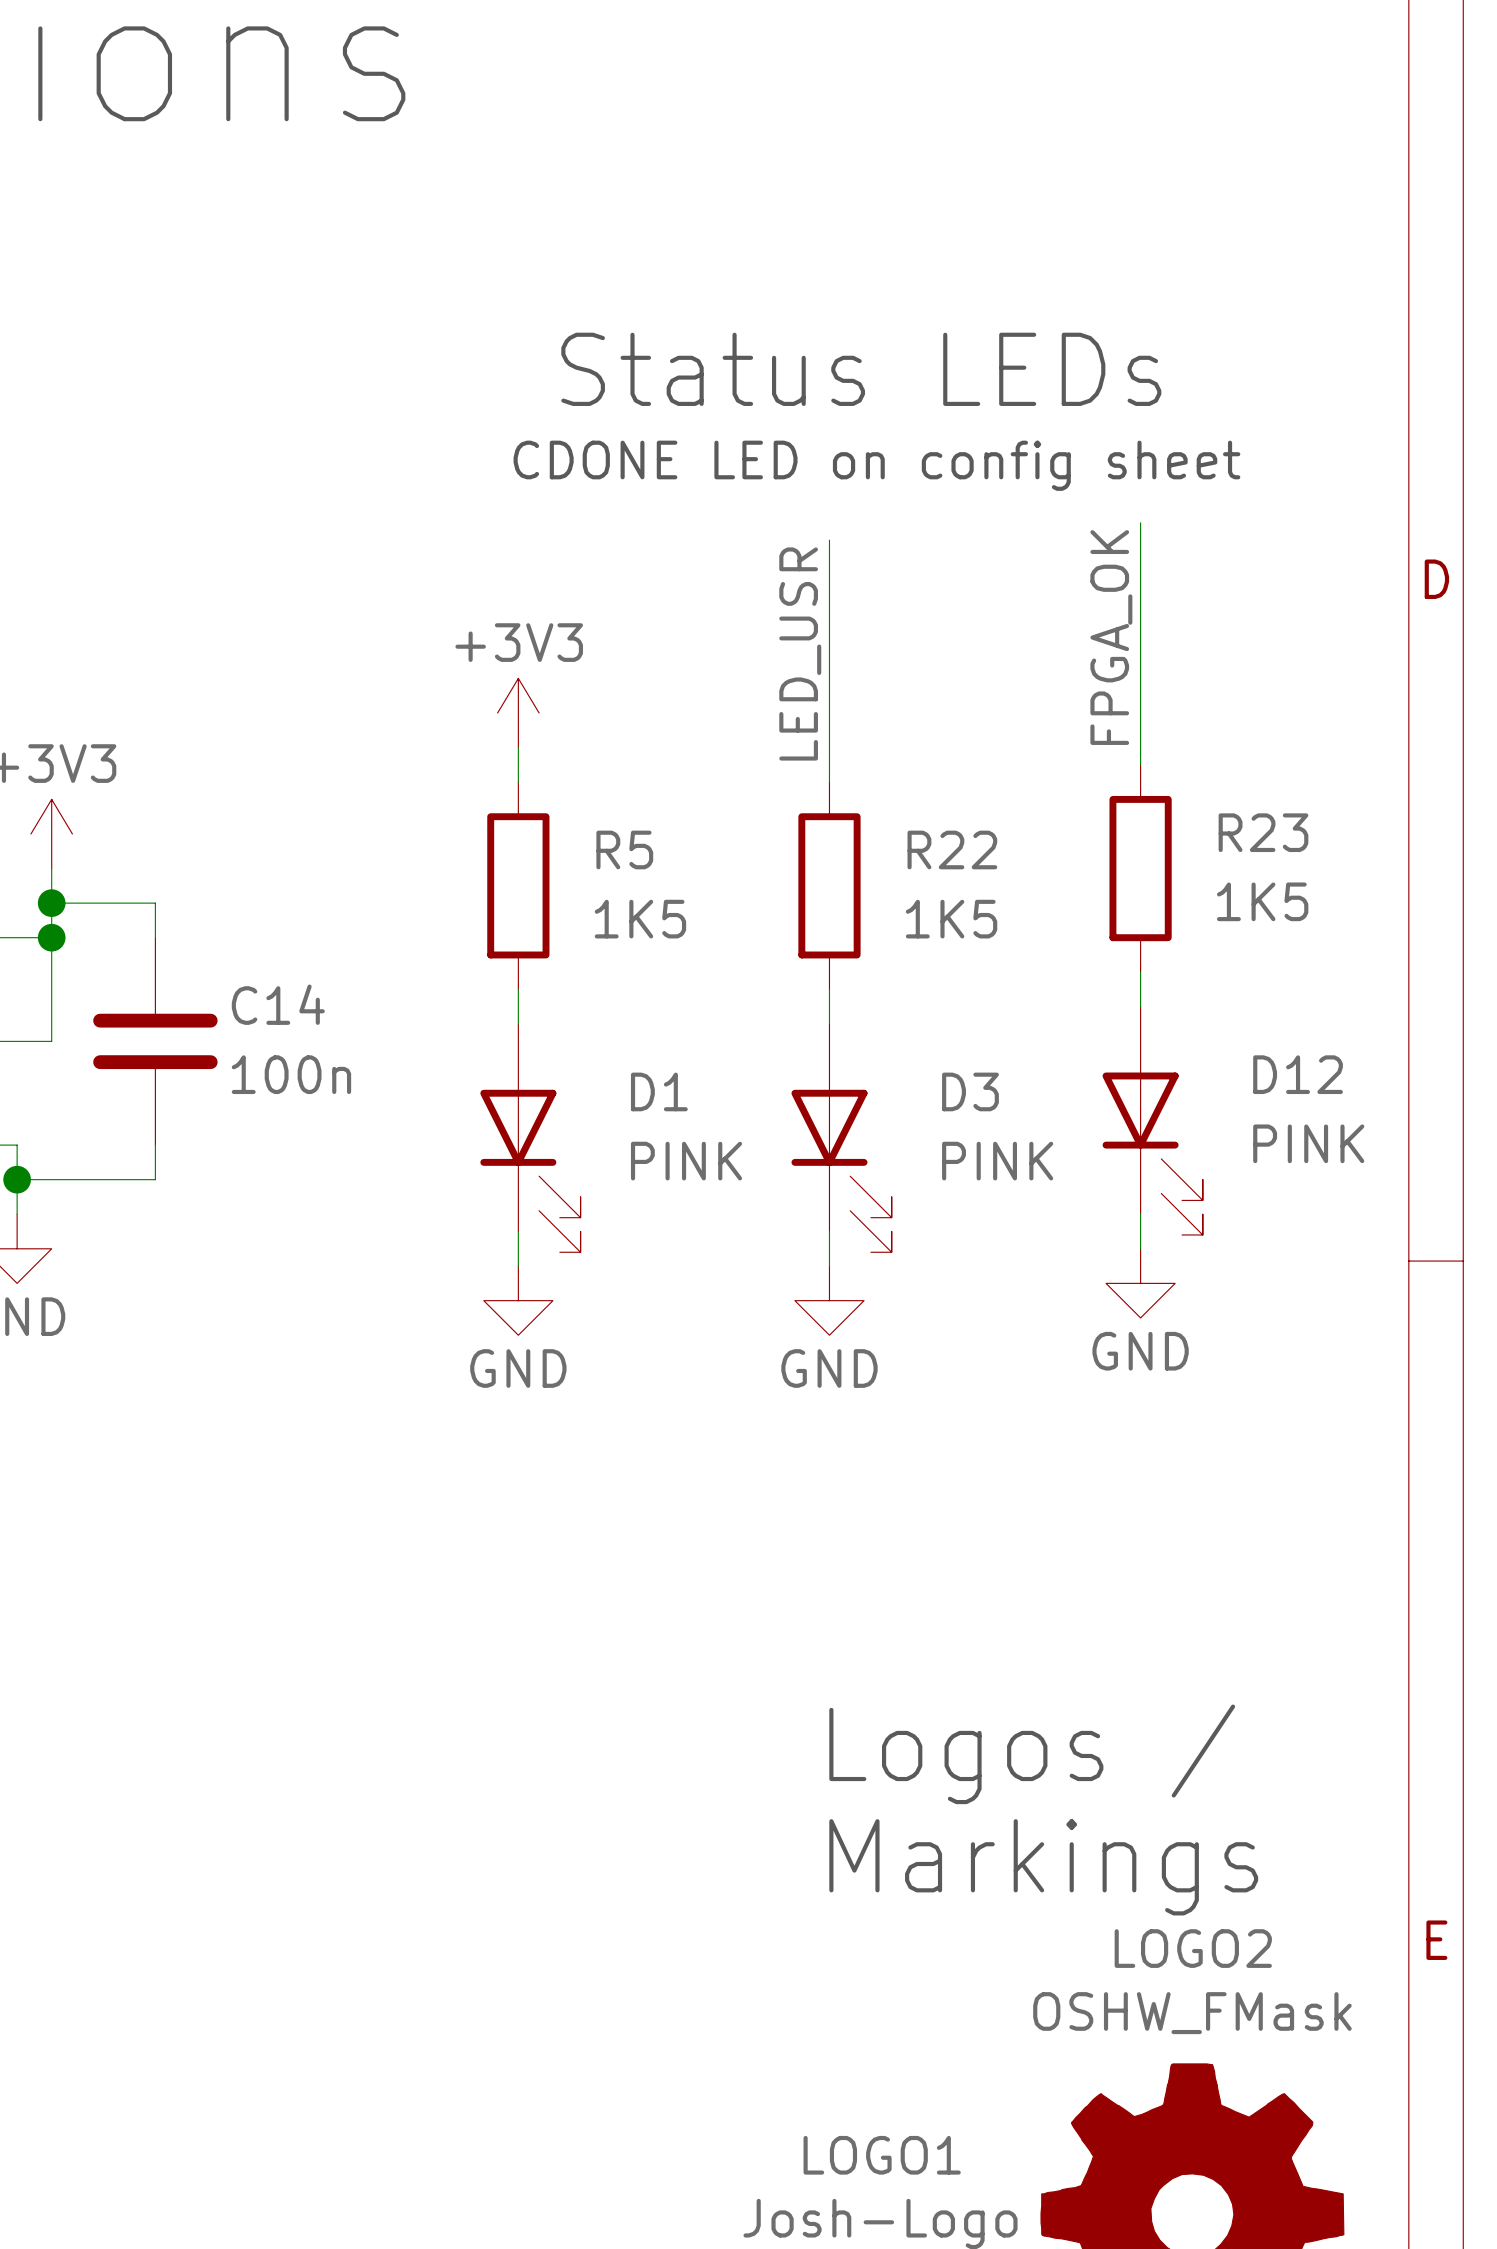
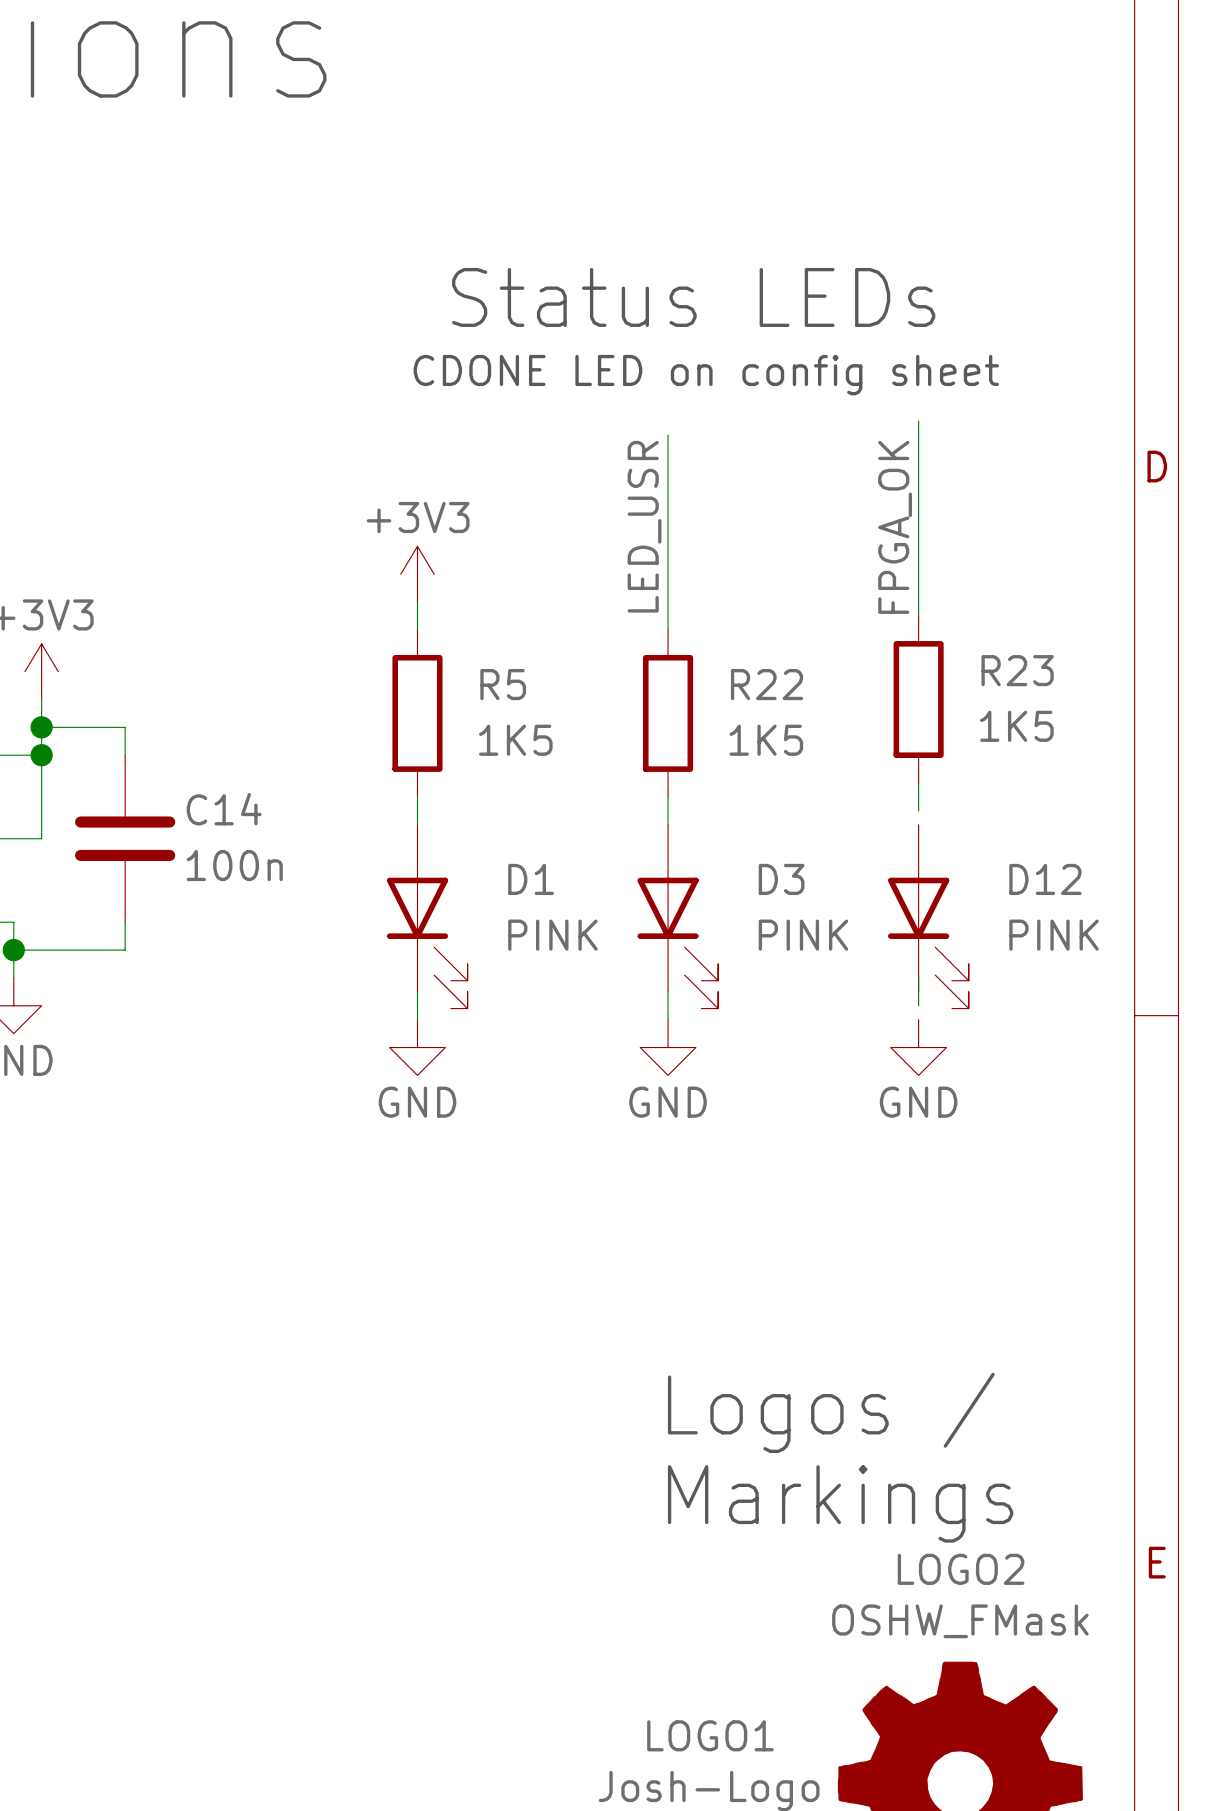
label position: FPGA_OK (1111, 637) -> FPGA_OK (895, 527)
D12 position: (1152, 1120) -> (928, 916)
power symbol position: GND (1140, 1283) -> GND (918, 1047)

